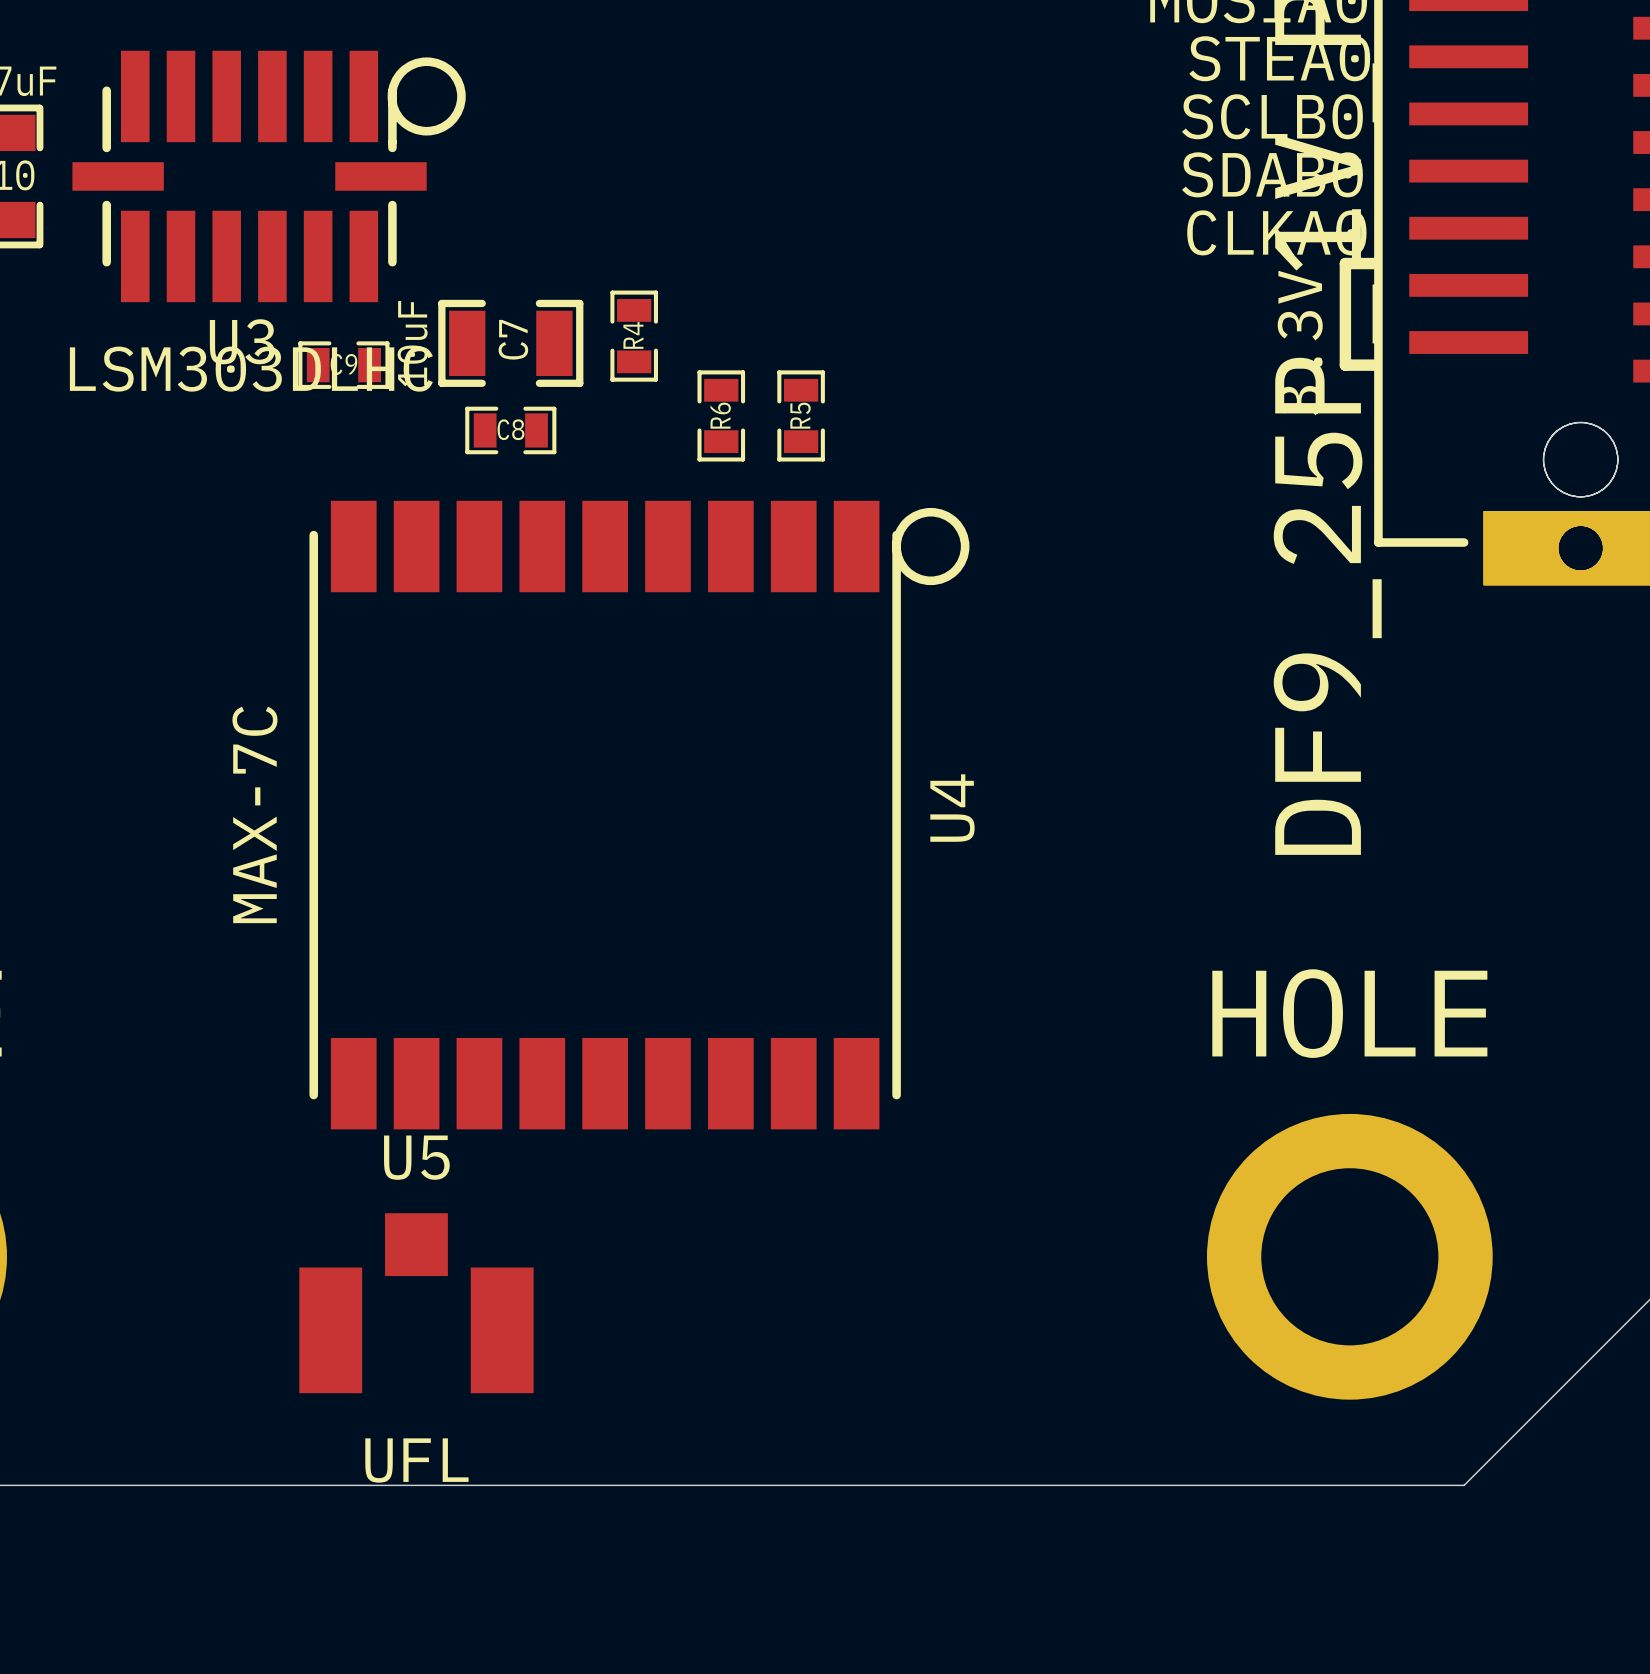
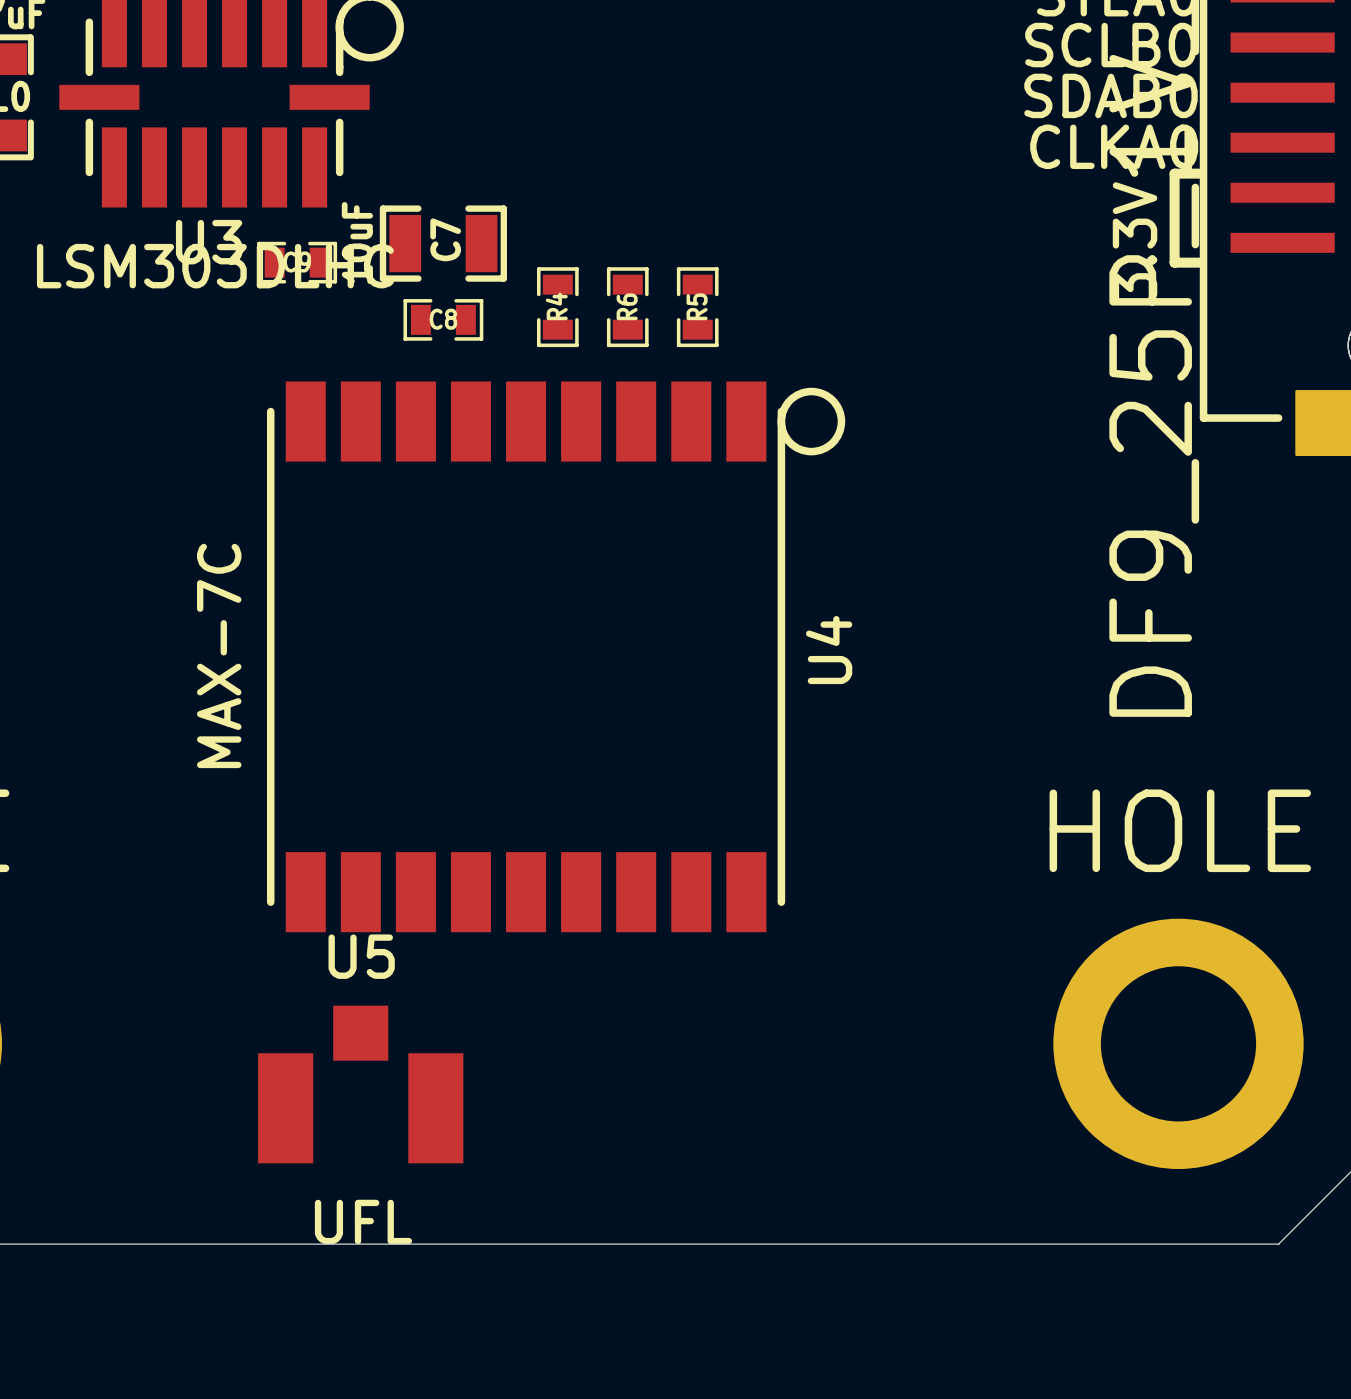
R4 position: (634, 336) -> (557, 307)

